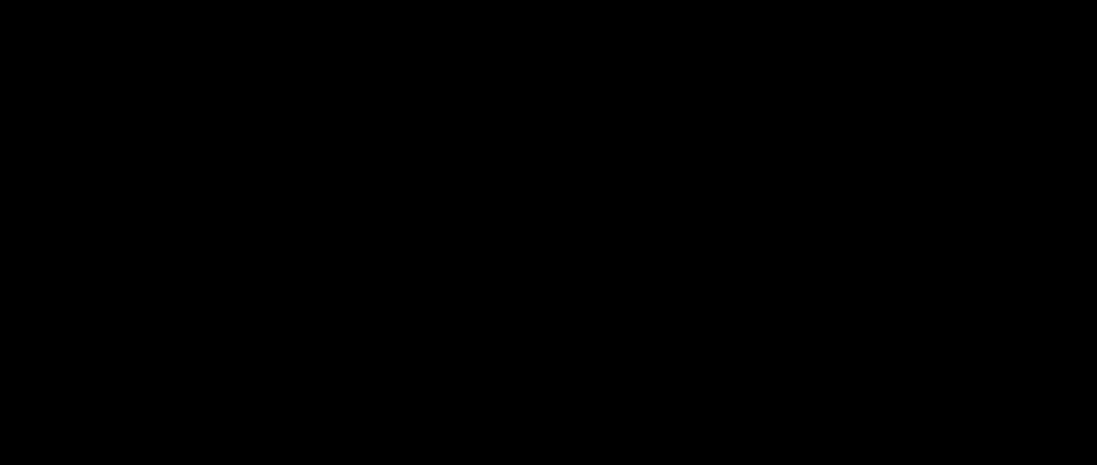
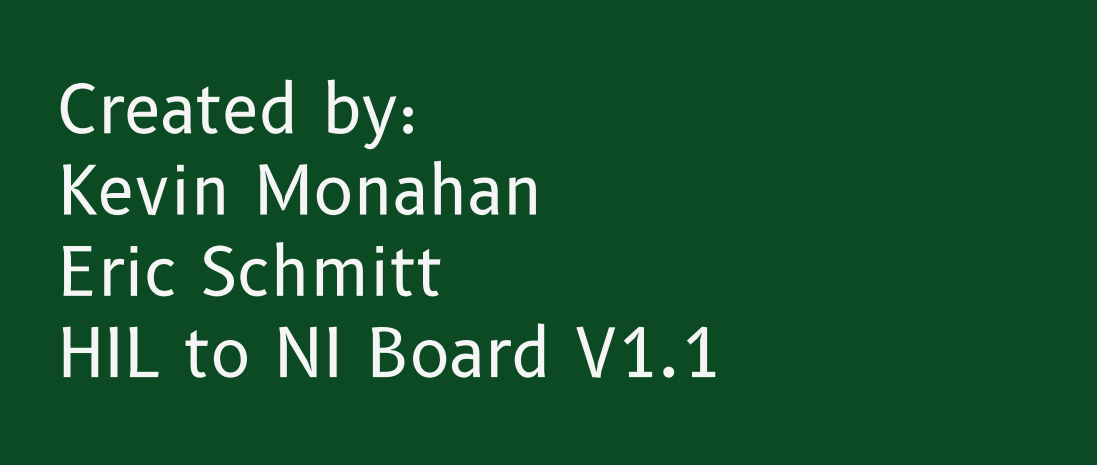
text: none -> Created by: (236, 114)
text: none -> Kevin Monahan (299, 188)
text: none -> Eric Schmitt (251, 269)
text: none -> HIL to NI Board V1.1 (388, 350)

